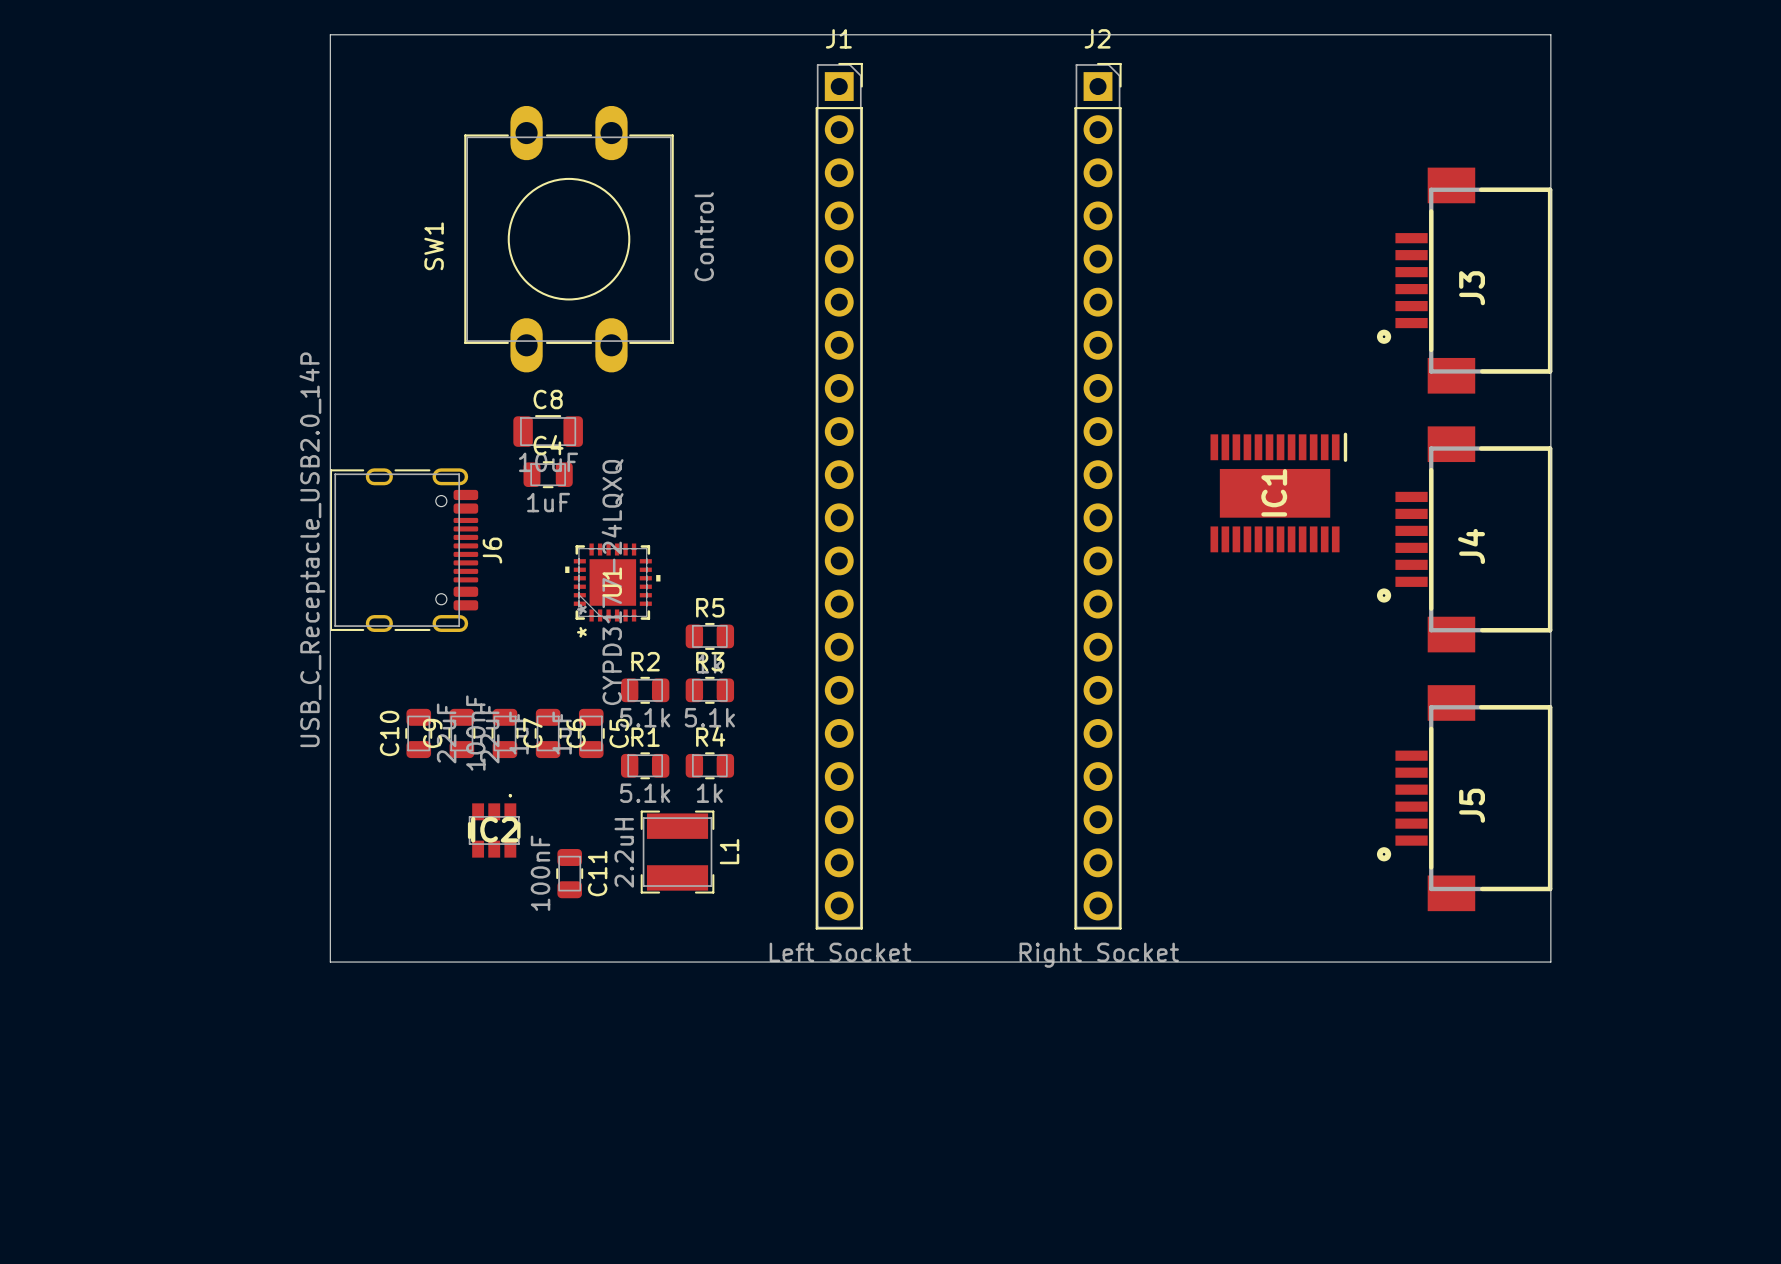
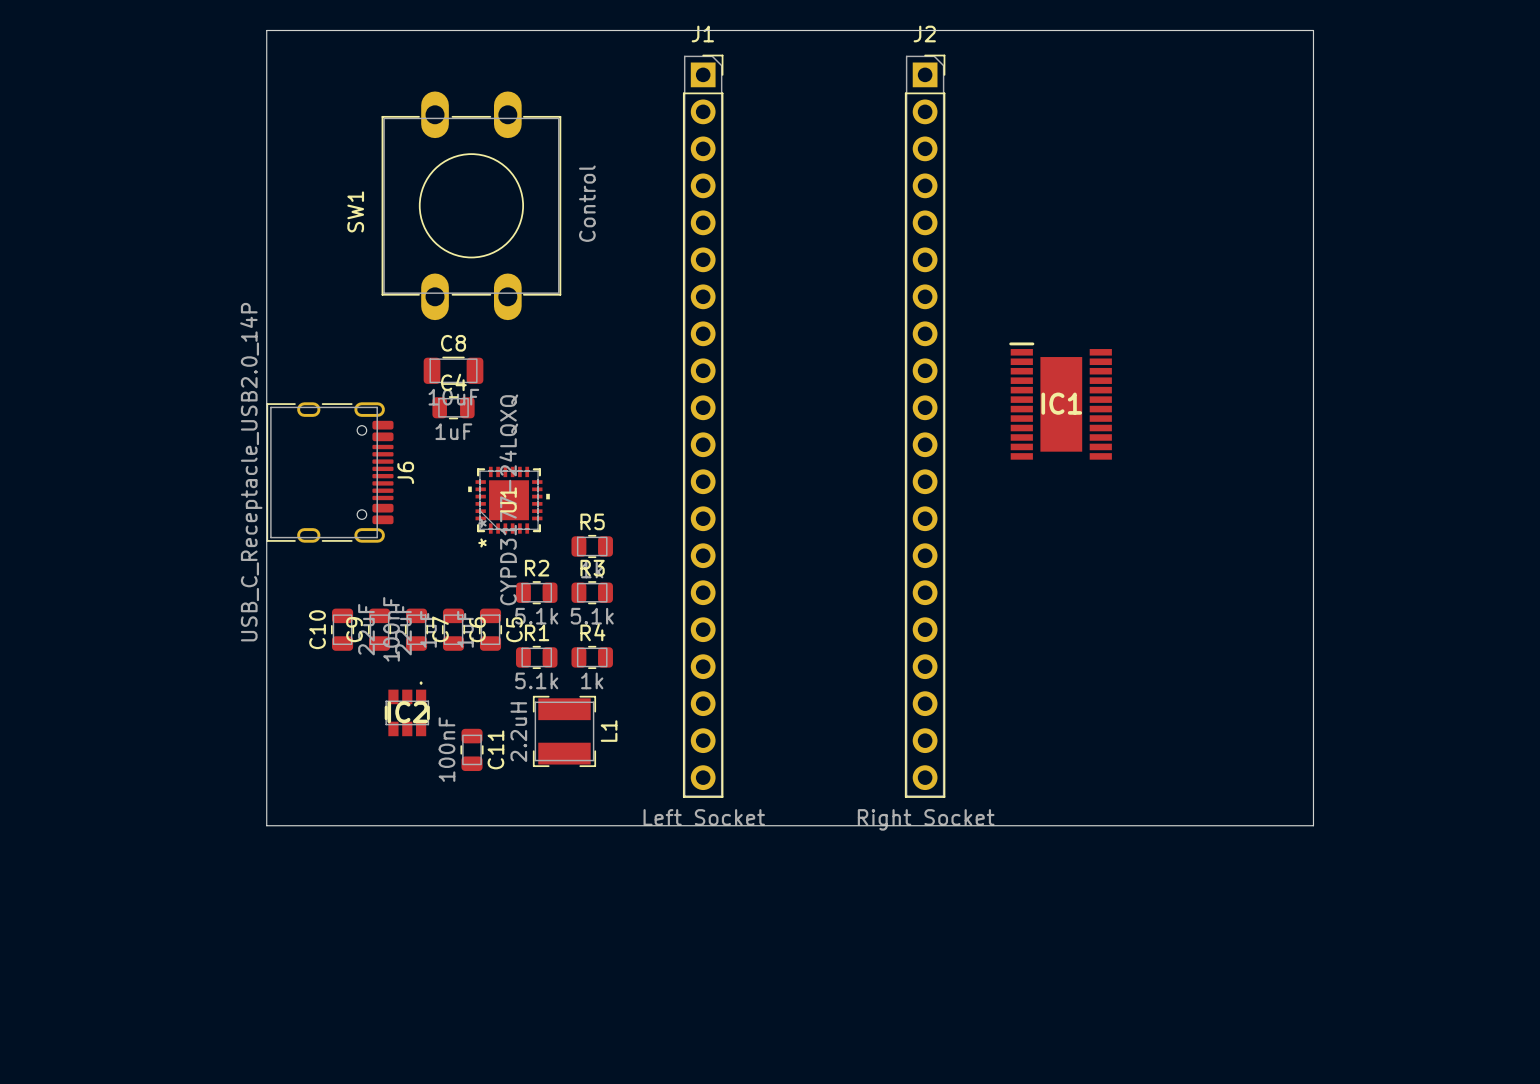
J3: (1464, 280) -> none
IC1 rotation: 0° (1278, 492) -> 90° counterclockwise (1060, 401)
J4: (1464, 539) -> none
J5: (1464, 798) -> none

